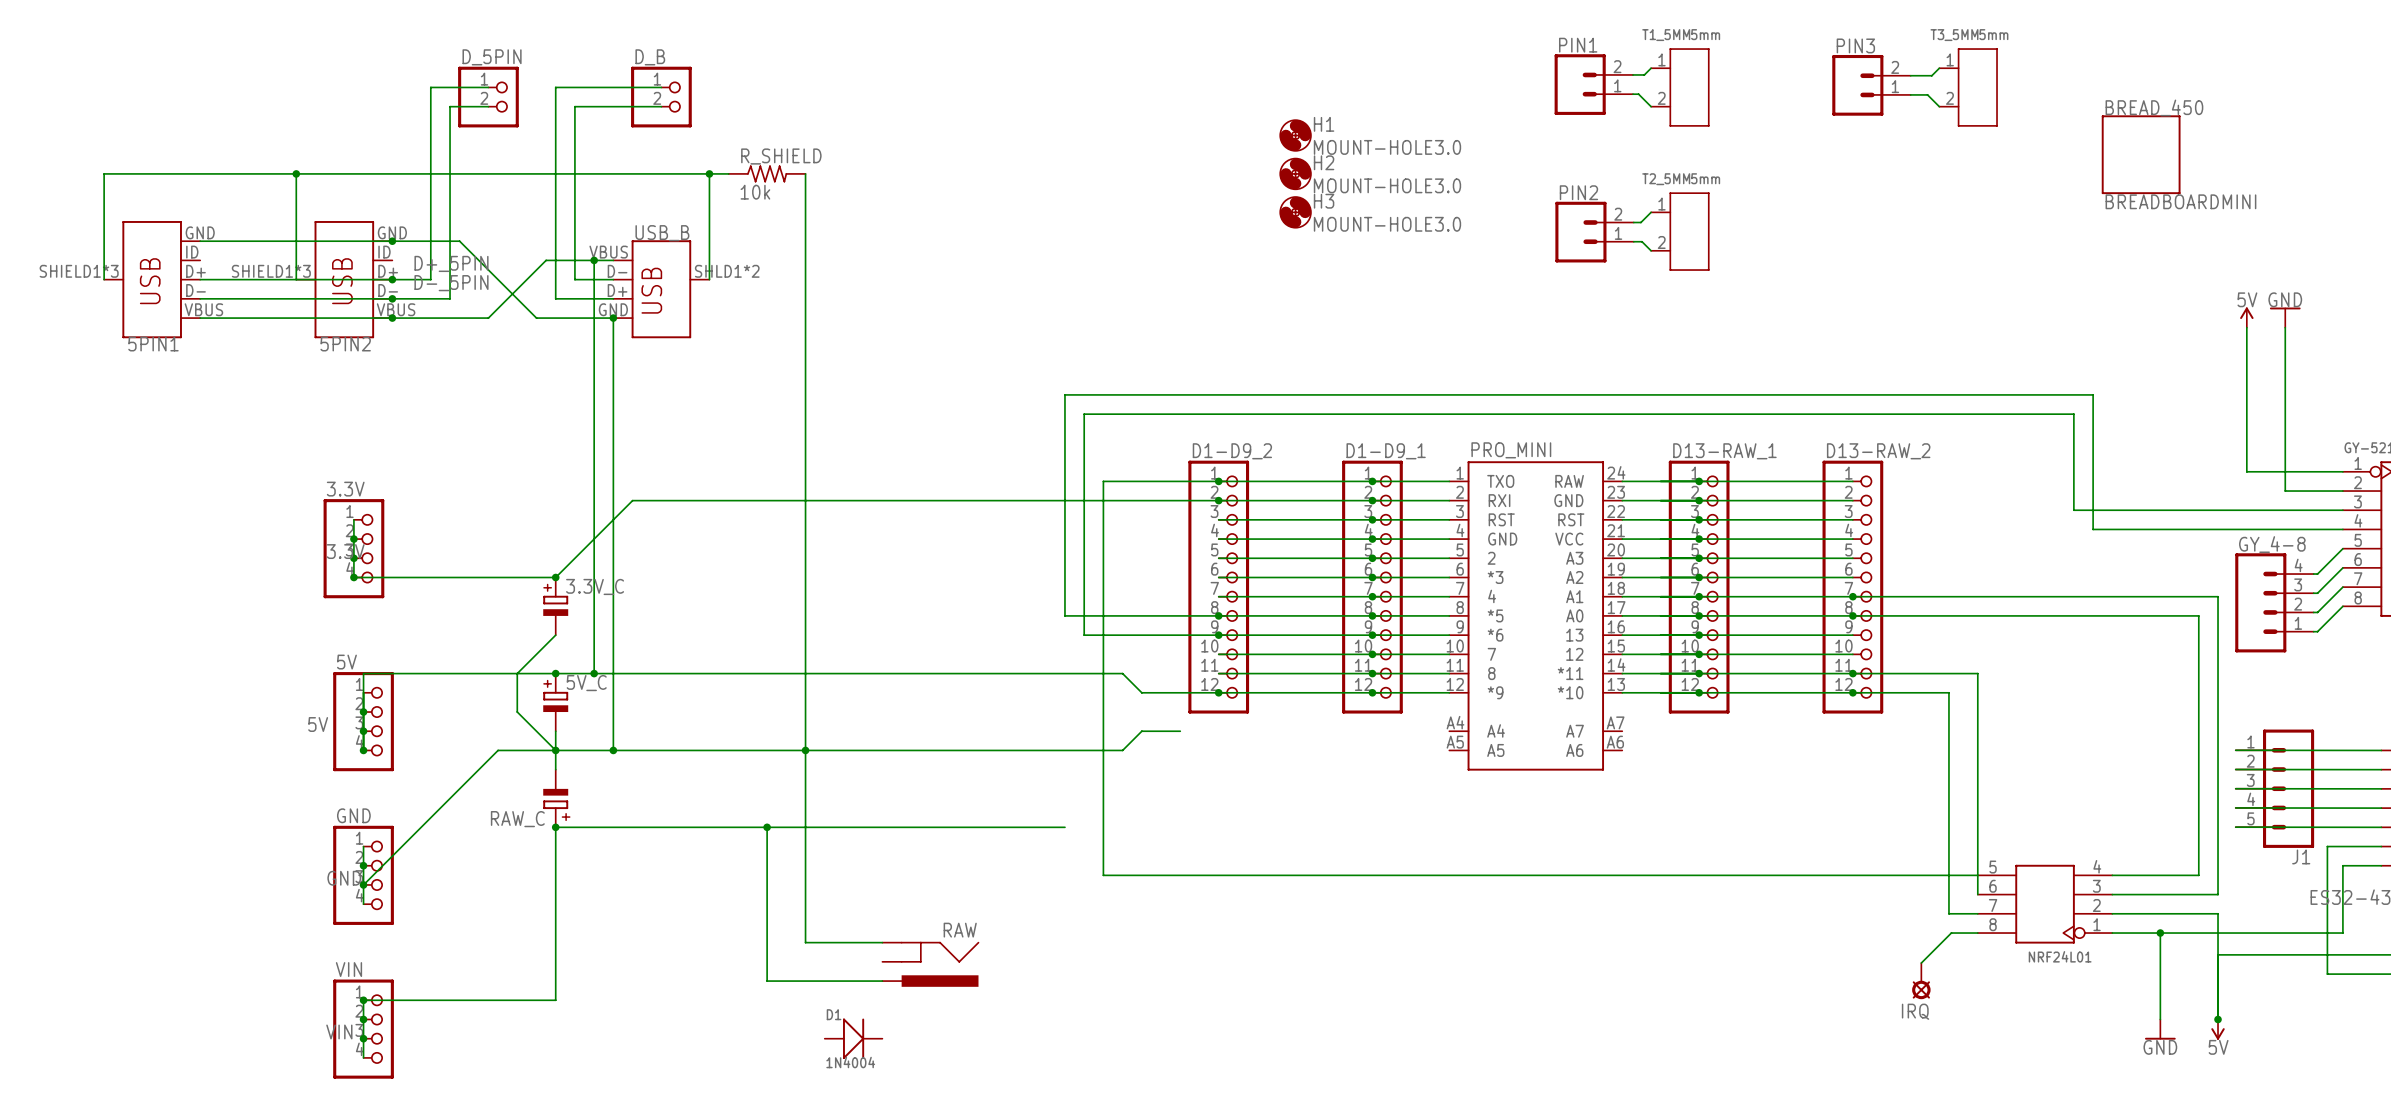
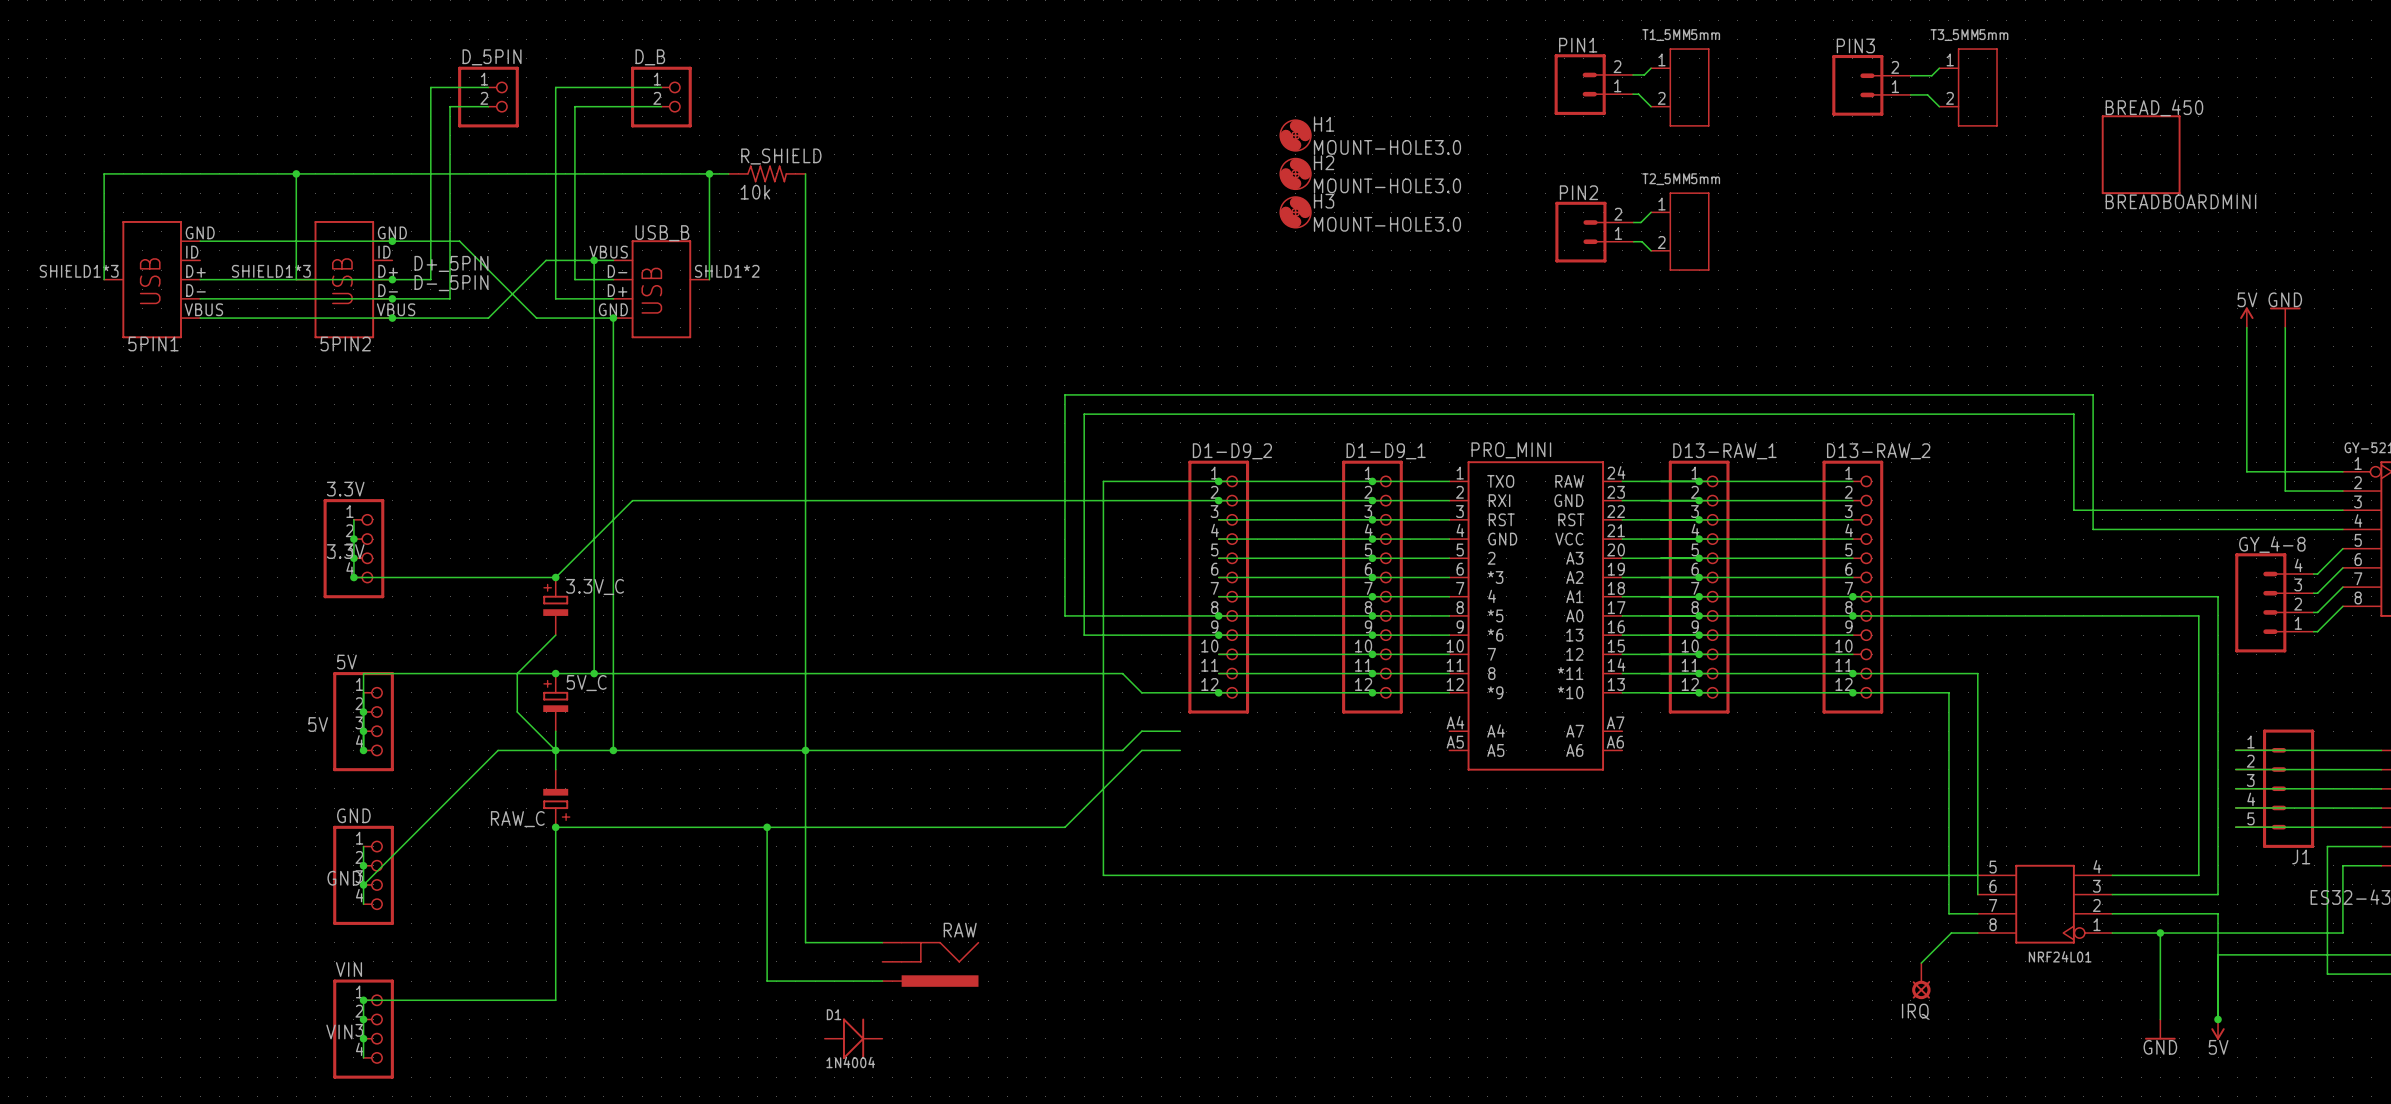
wire: none -> (1180, 750) (1141, 750) (1064, 827)

